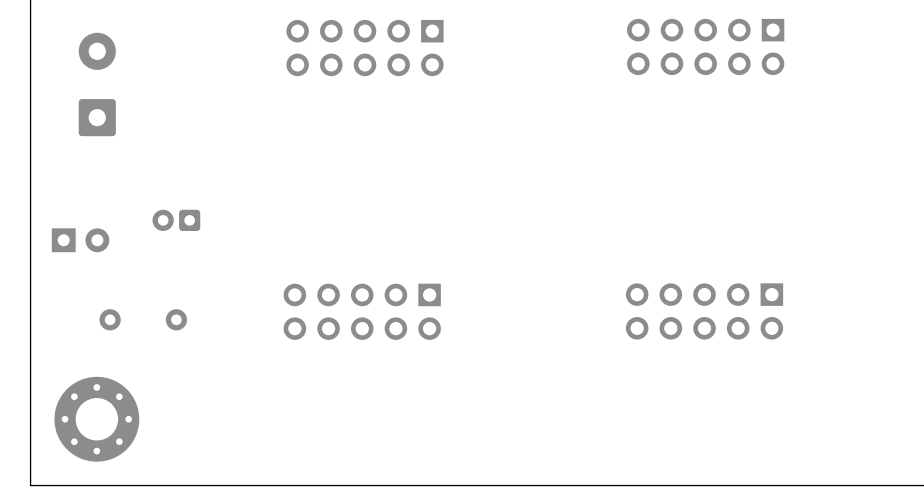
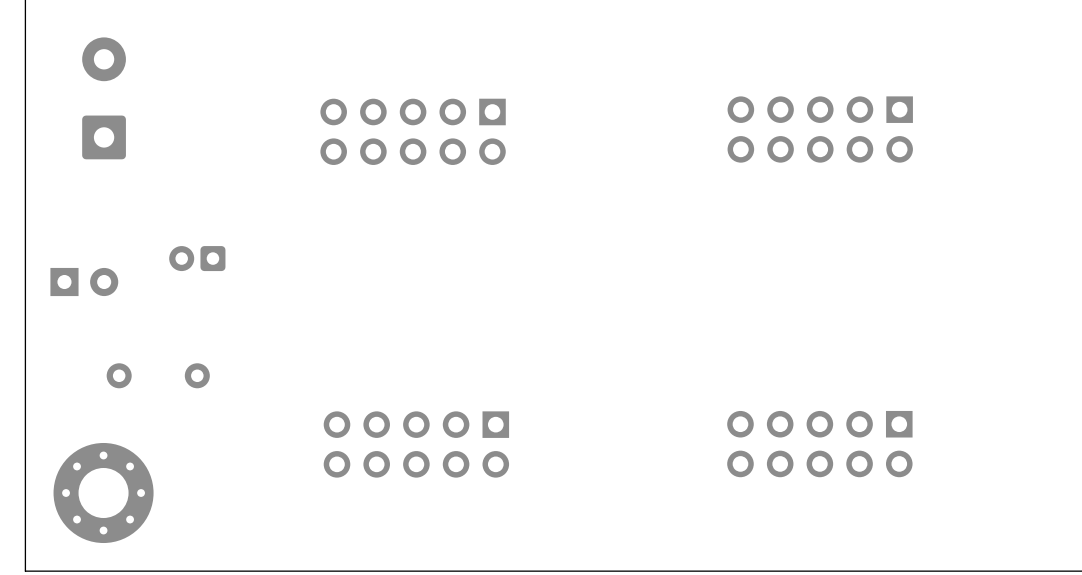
part position: (705, 46) -> (820, 129)
part position: (364, 48) -> (413, 131)
part position: (362, 311) -> (416, 444)
part position: (704, 311) -> (819, 444)

